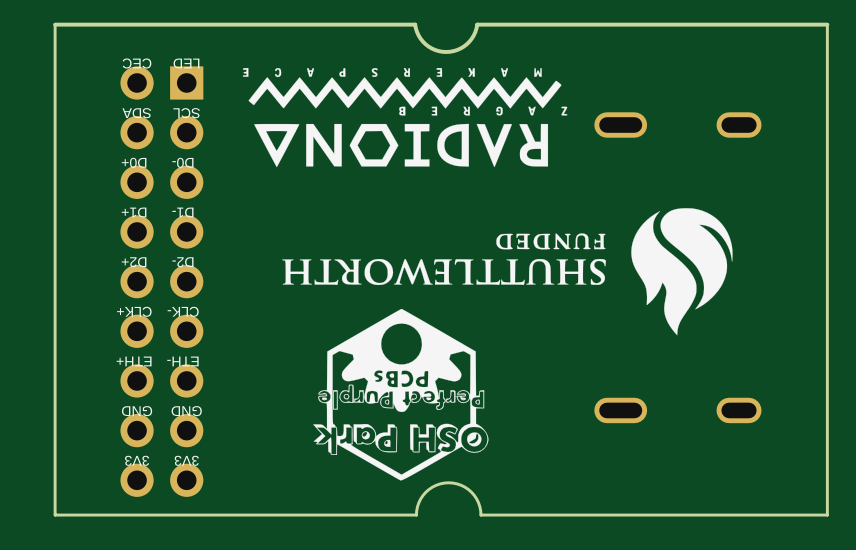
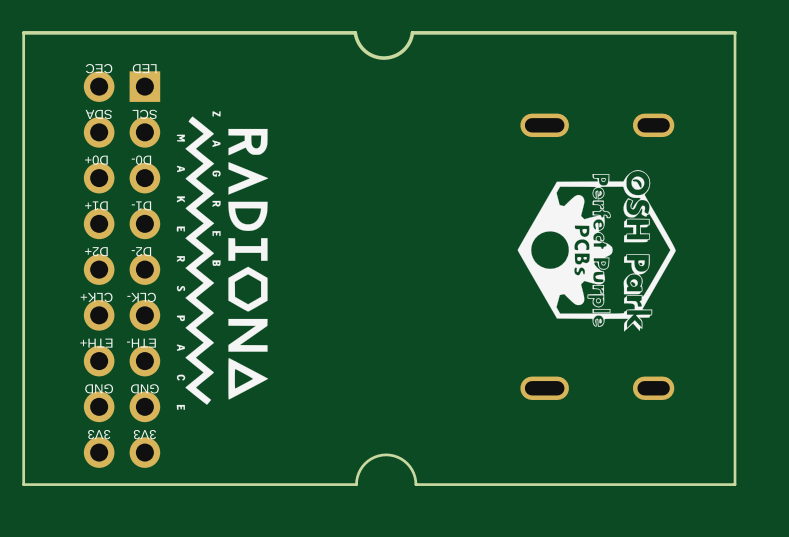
drawing: [242, 67, 568, 168] -> none
drawing: none -> [176, 111, 269, 410]
drawing: none -> [517, 170, 676, 332]
drawing: [282, 208, 733, 481] -> none

